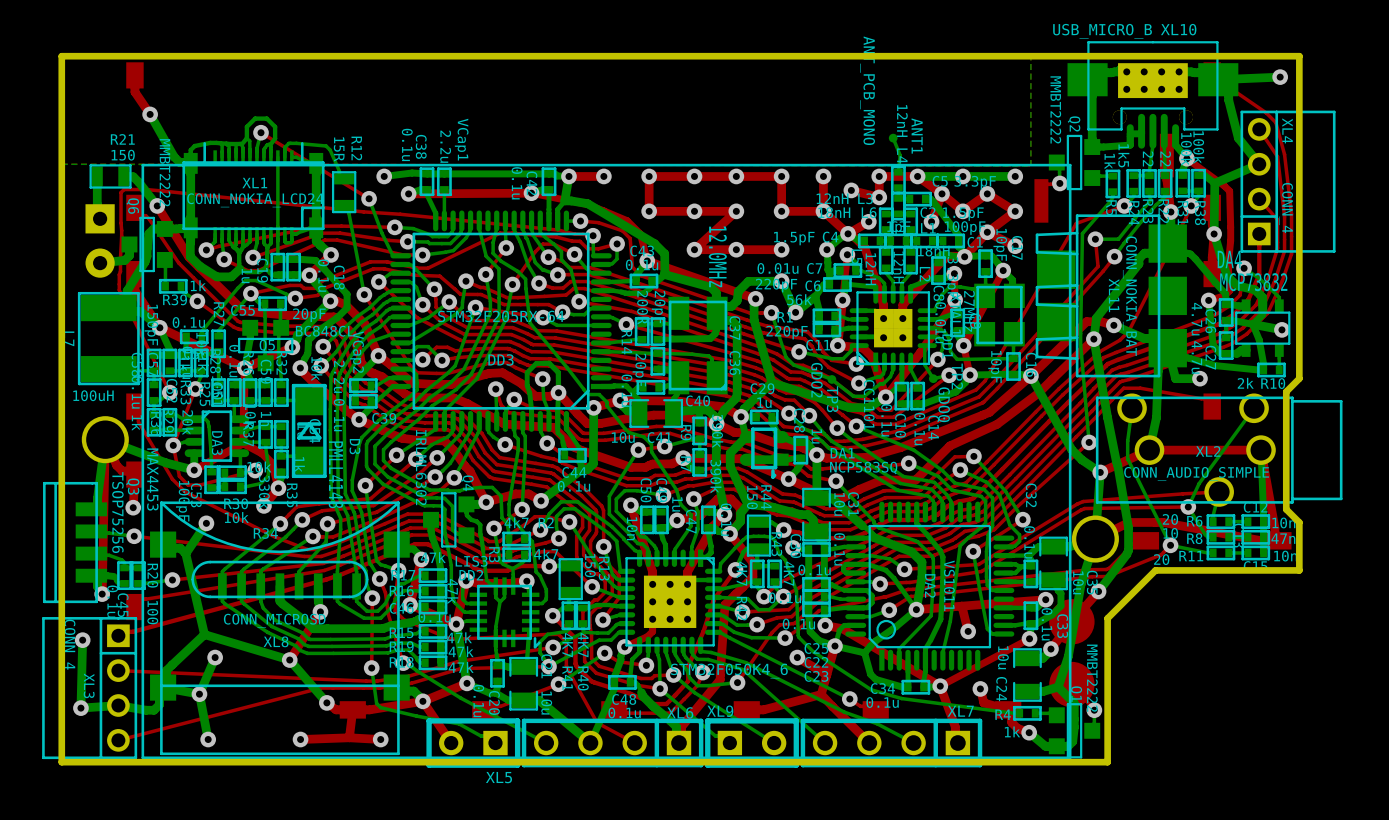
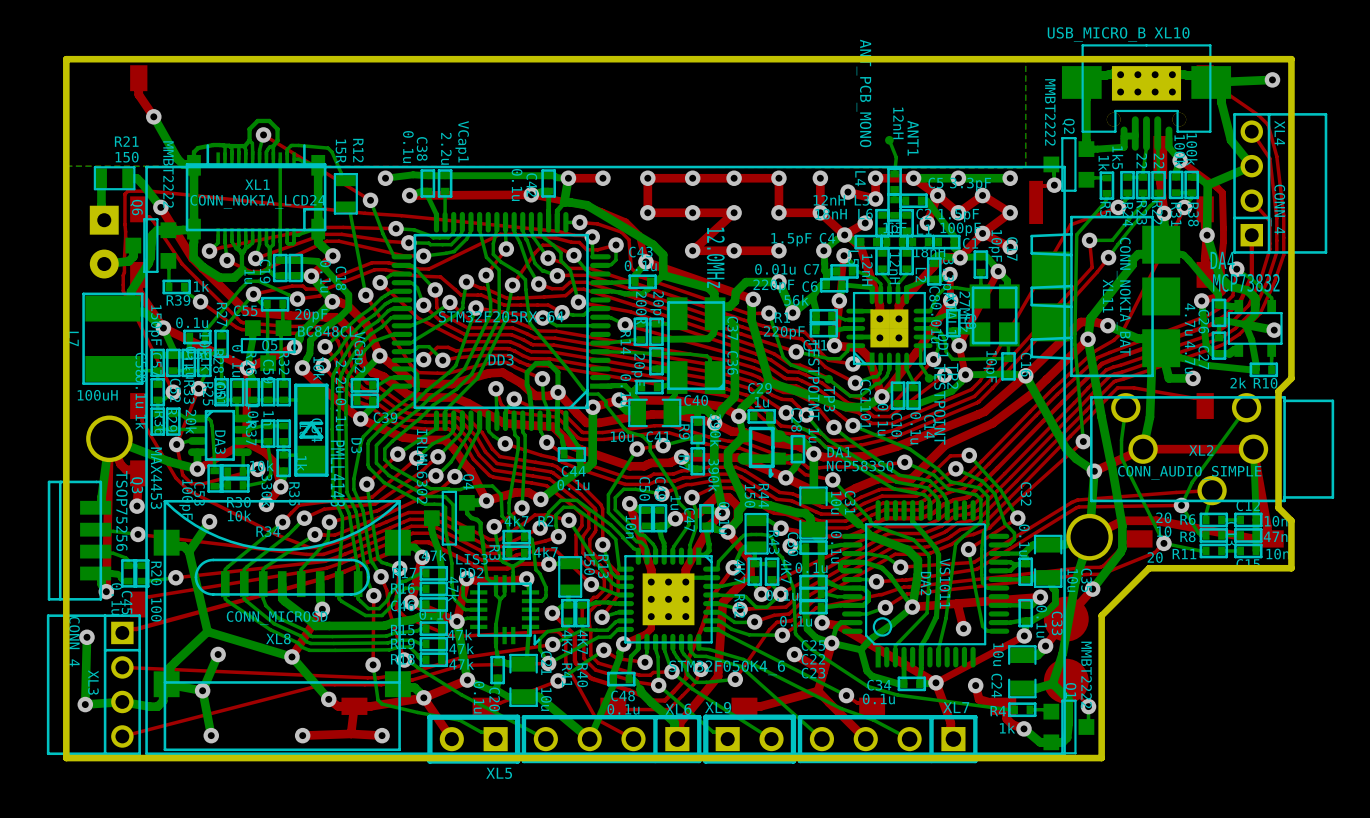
L4 name position: L4 (902, 155) -> L4 (860, 178)
TP3 value: GDO2 (816, 380) -> TESTPOINT (813, 380)
TP2 value: GDO0 (944, 404) -> TESTPOINT (939, 404)

